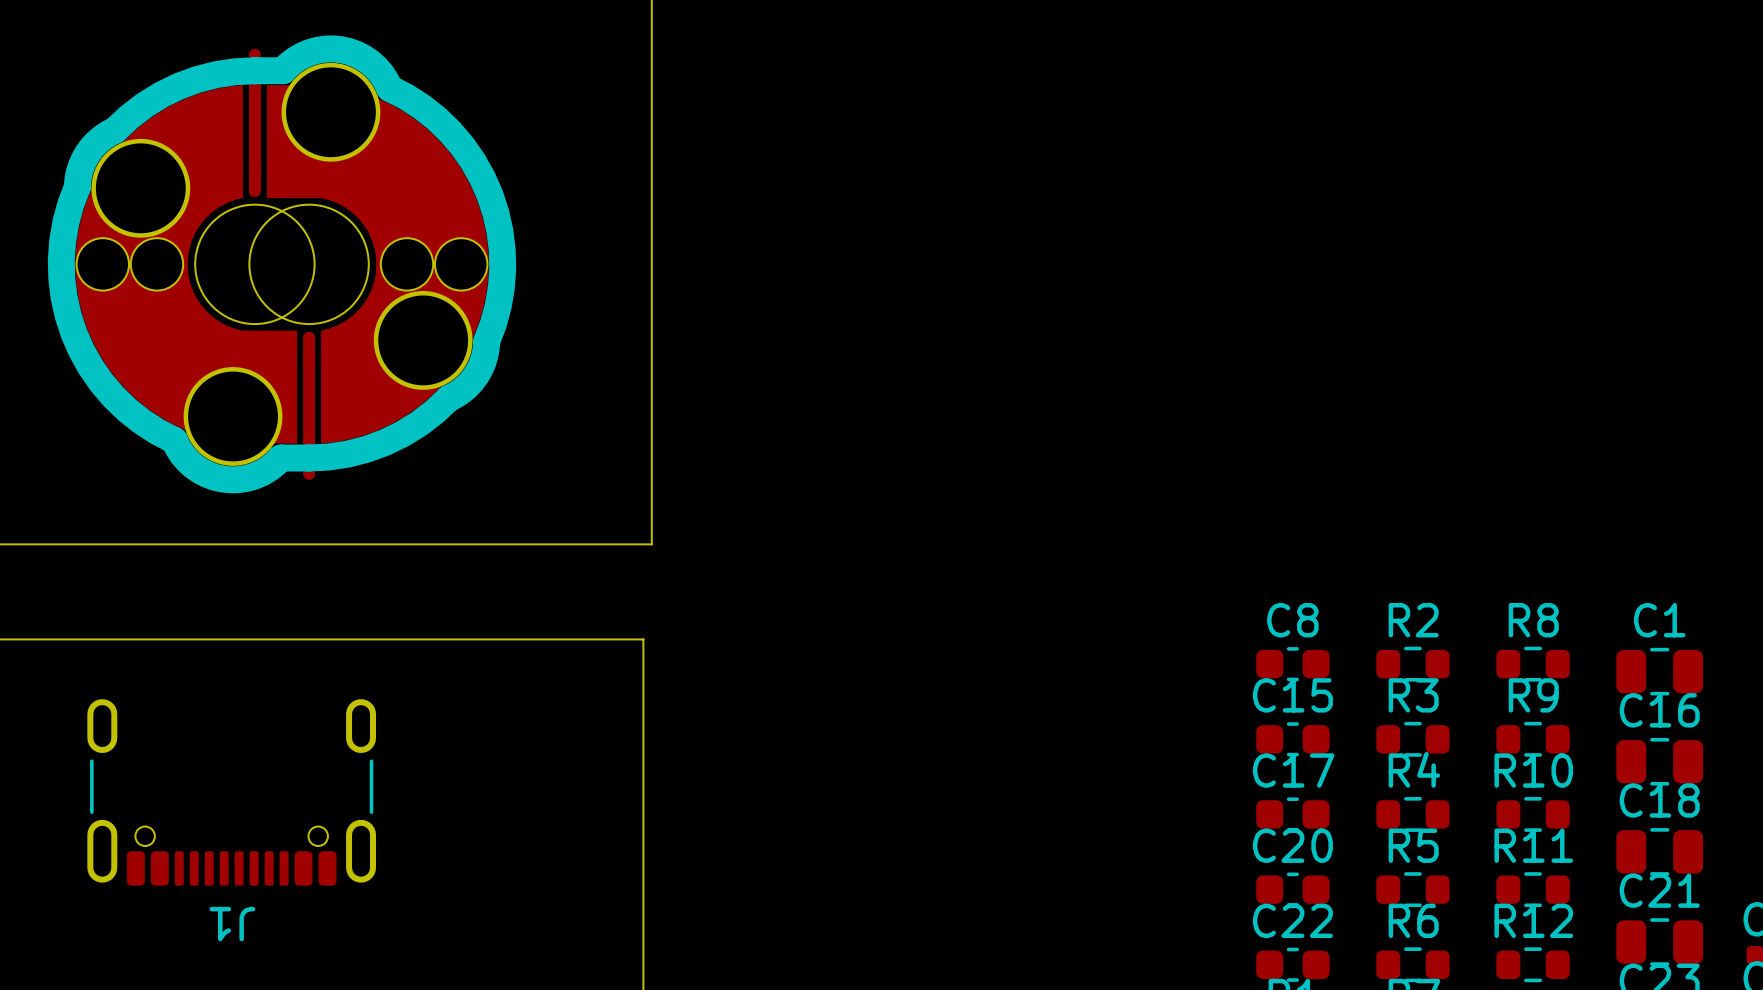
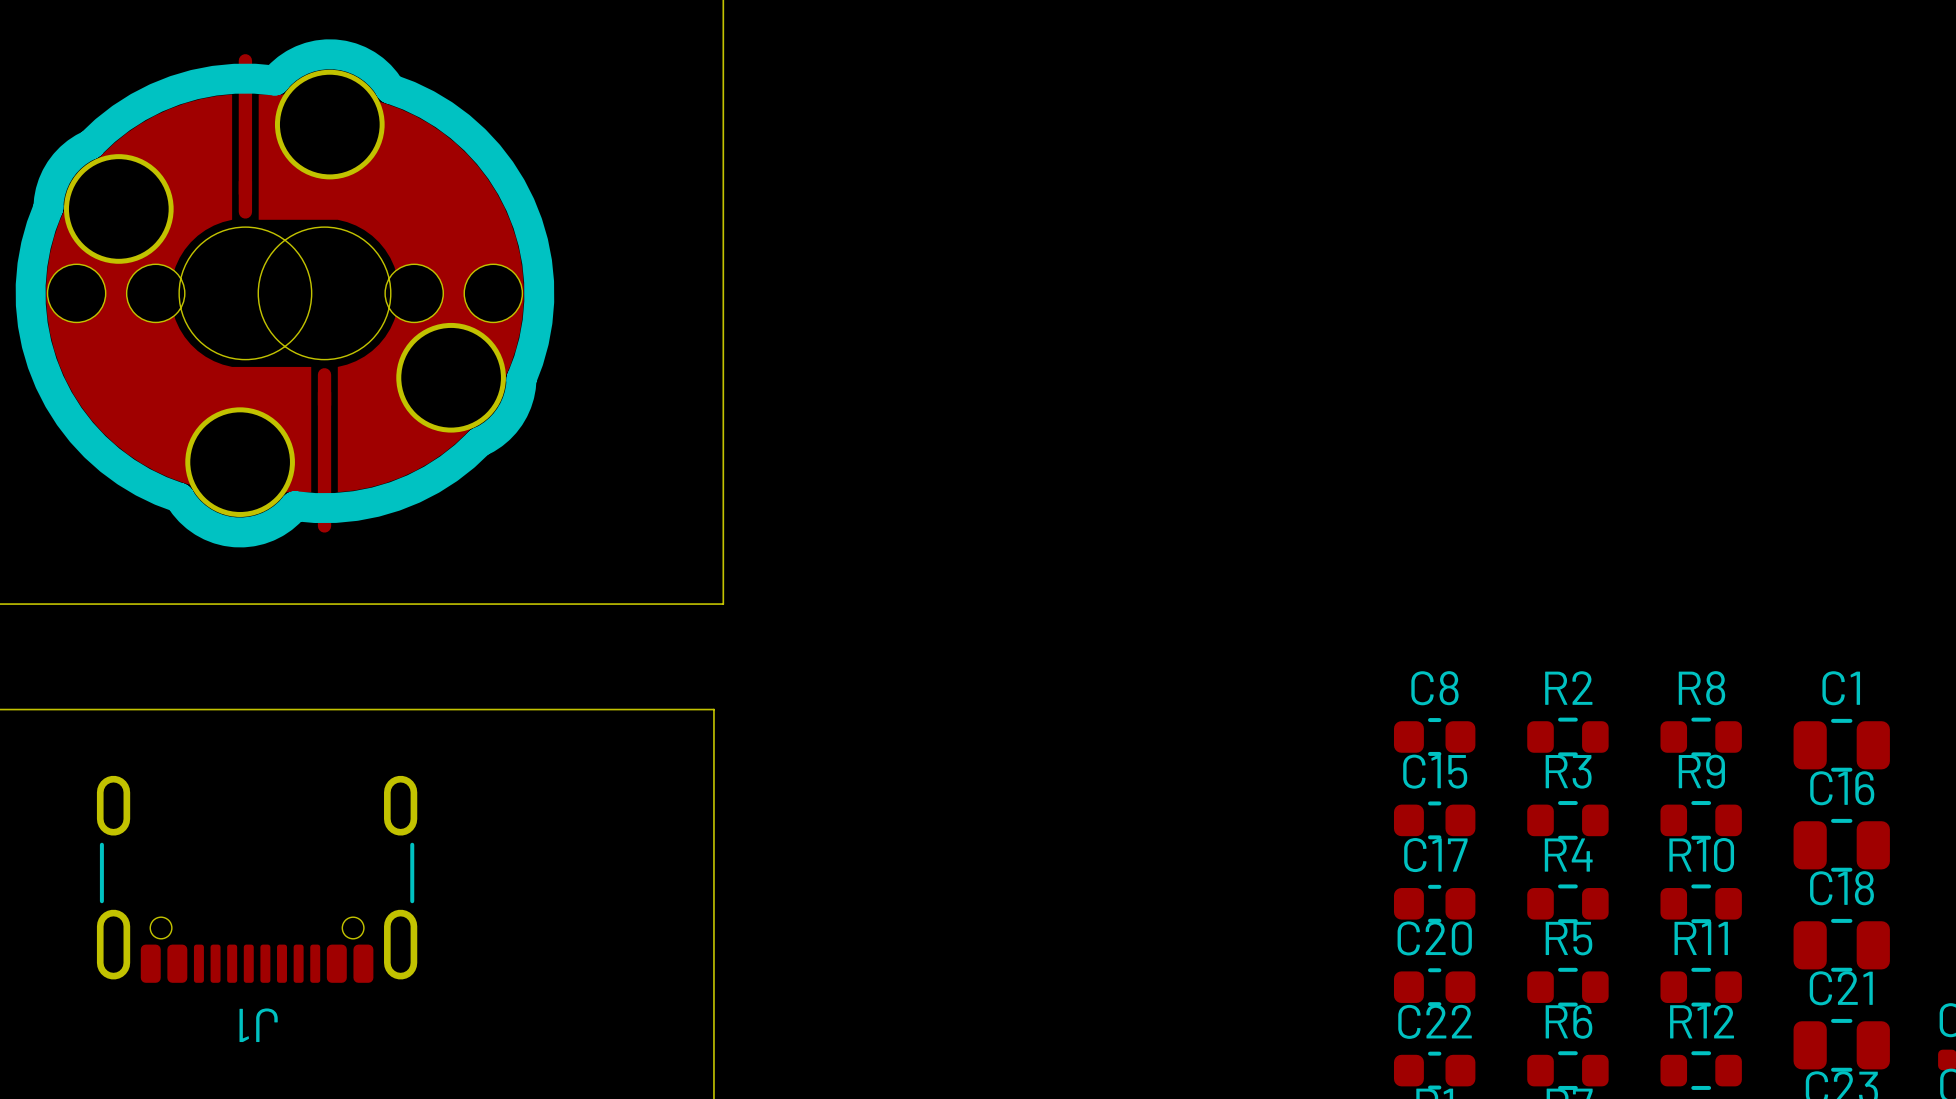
part footprint: [47, 35, 517, 494] -> [15, 39, 555, 548]

